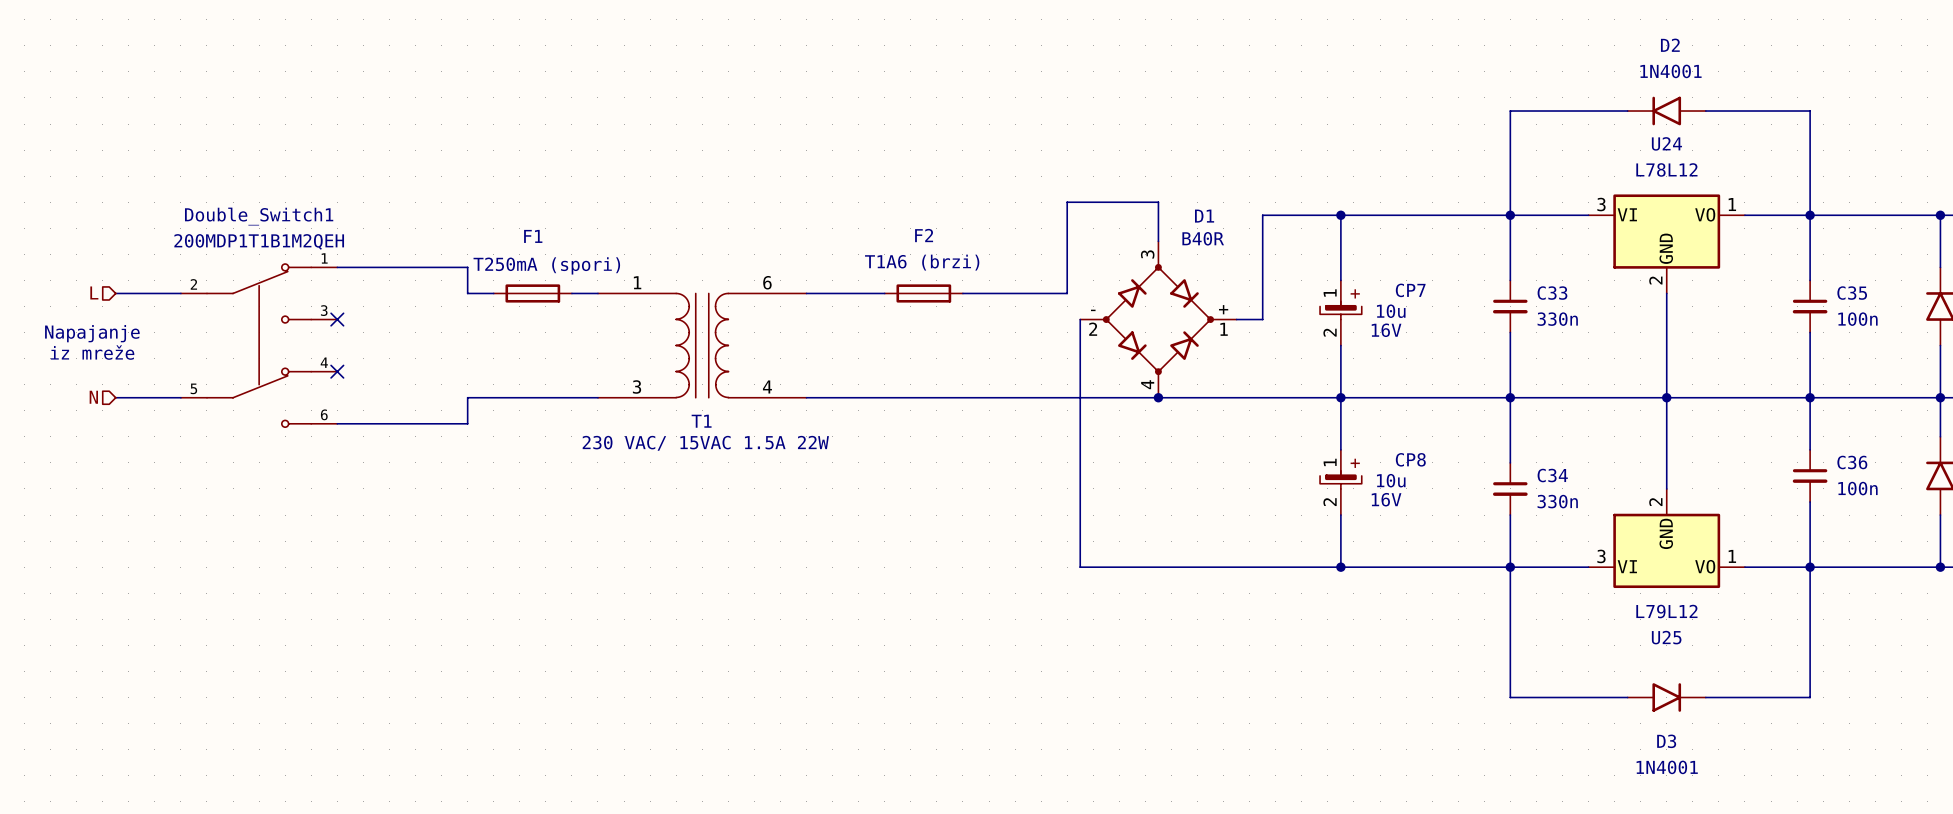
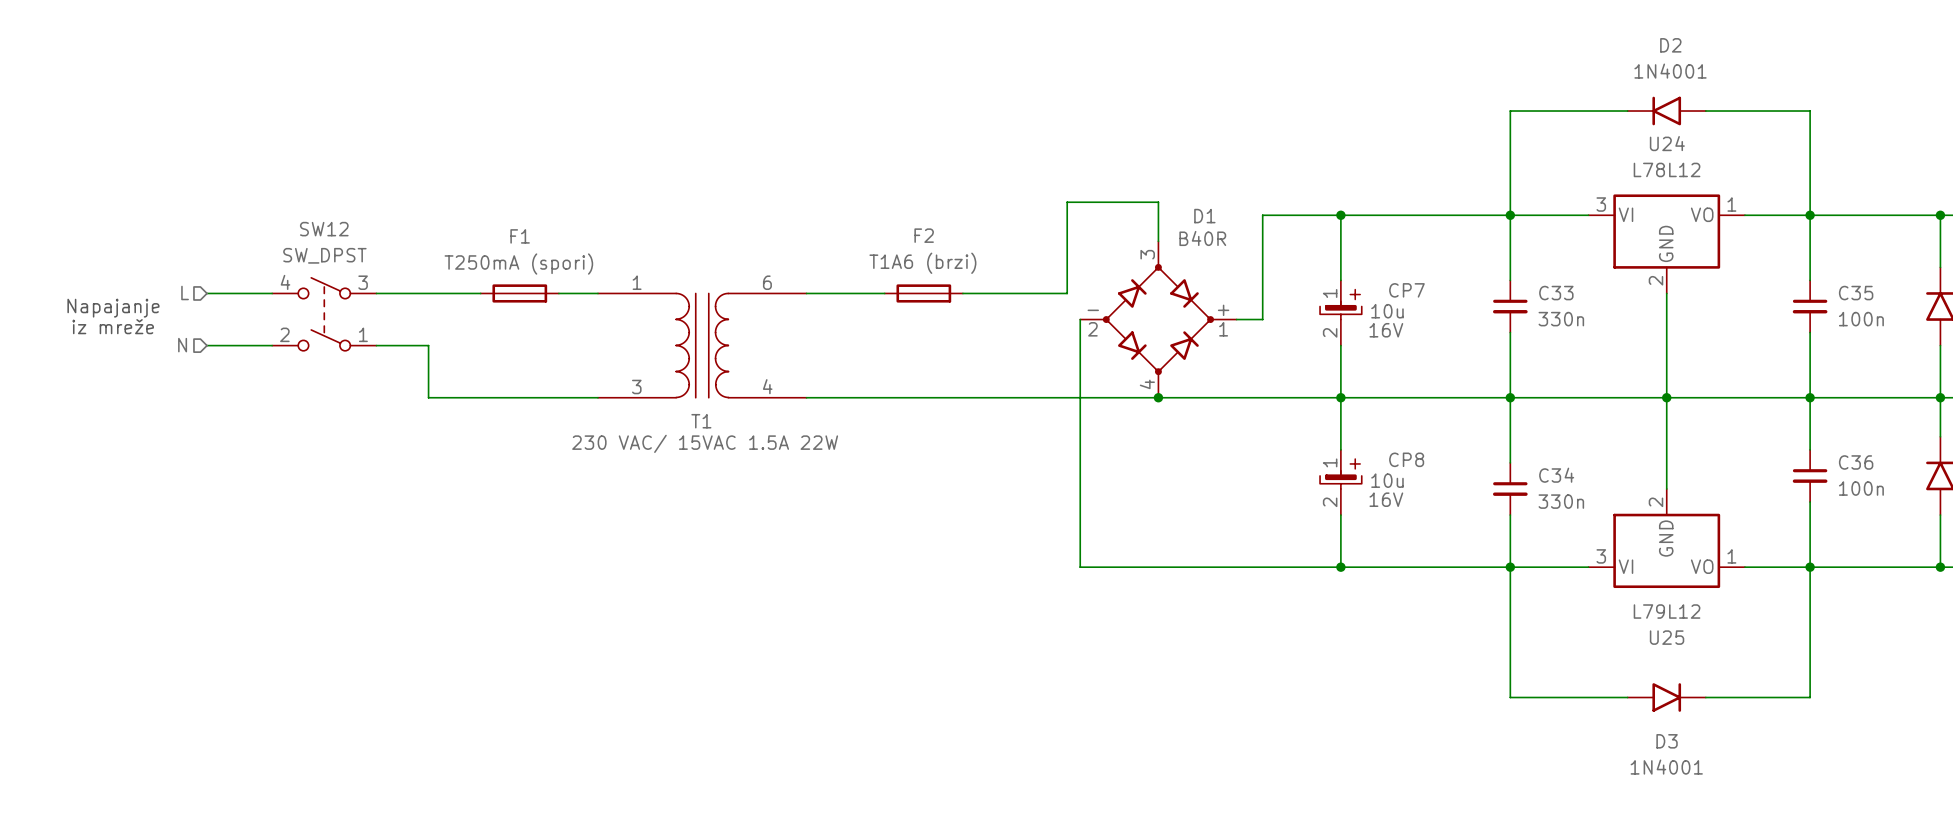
F1 value position: T250mA (spori) (546, 265) -> T250mA (spori) (518, 264)
wire: (337, 267) (467, 267) (467, 293) -> (376, 293) (467, 293)
hierarchical label position: L (94, 292) -> L (185, 292)
wire: (115, 293) (180, 293) -> (206, 293) (272, 293)
F1 position: (532, 293) -> (519, 293)
SW12: none -> SW_DPST (324, 314)
no-connect mark: (337, 319) -> none
text position: Napajanje (92, 333) -> Napajanje (113, 308)
Double_Switch1: 200MDP1T1B1M2QEH (259, 345) -> none
text position: iz mreže (92, 352) -> iz mreže (113, 326)
no-connect mark: (337, 371) -> none
hierarchical label position: N (93, 397) -> N (182, 345)
wire: (115, 397) (180, 397) -> (206, 345) (272, 345)
wire: (467, 397) (467, 423) (337, 423) -> (467, 397) (428, 397) (428, 345) (376, 345)

